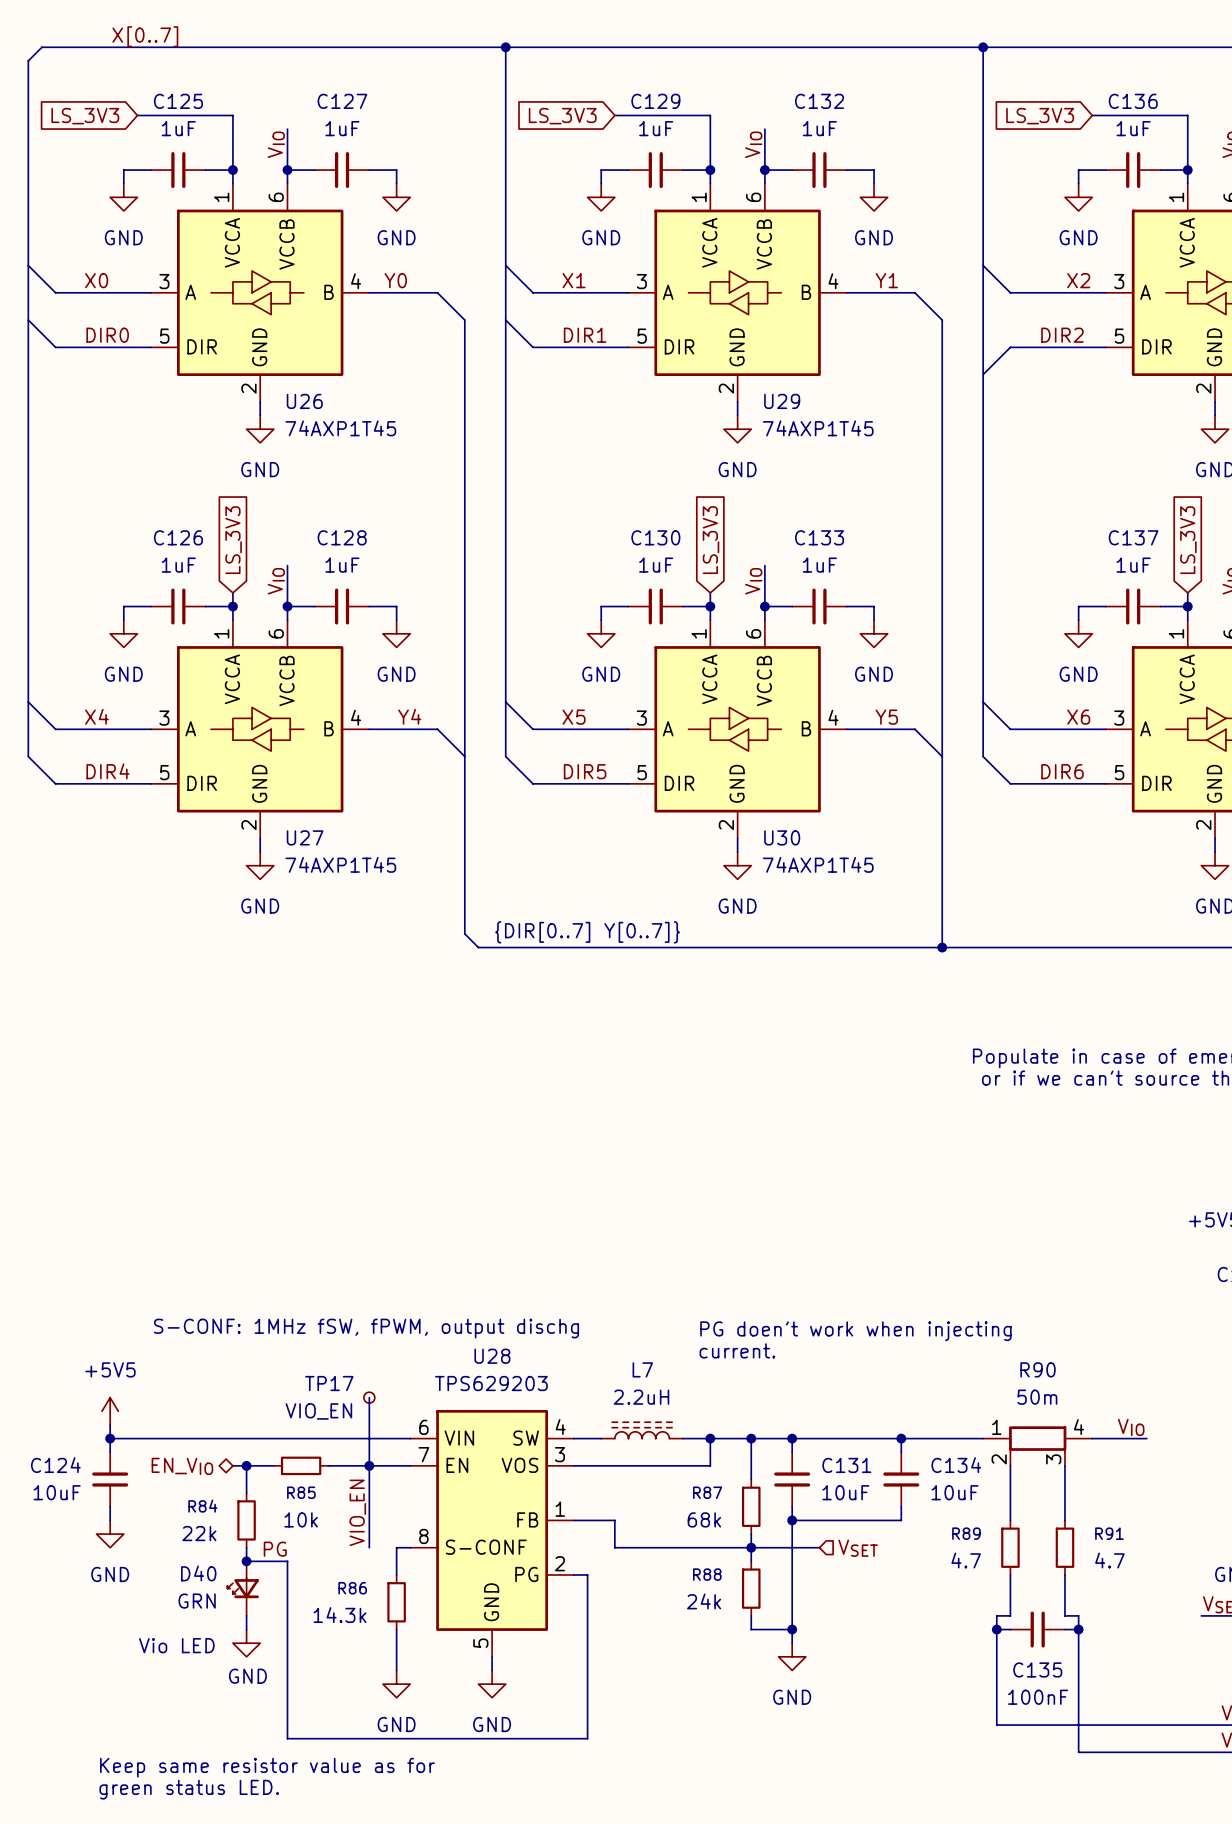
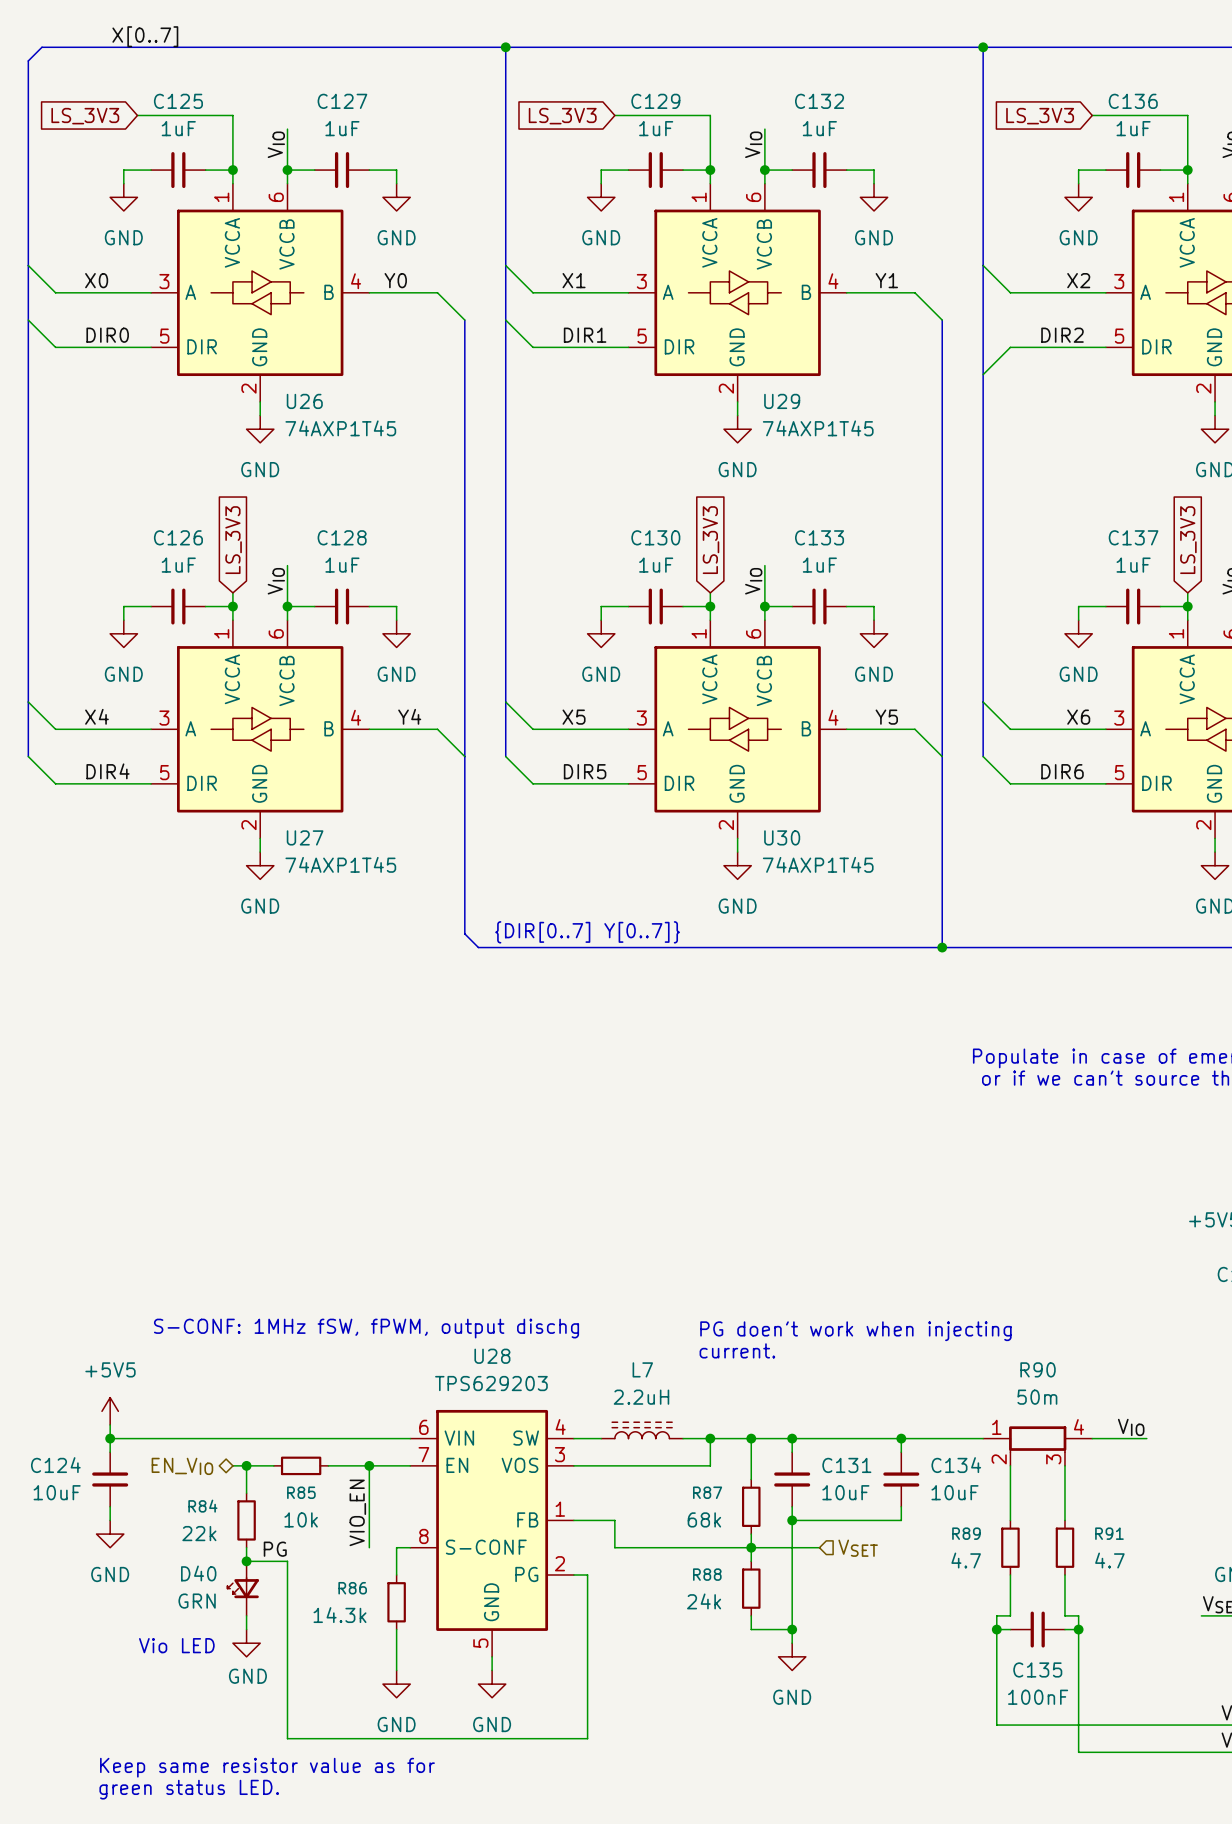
wire: (369, 1397) (369, 1465) -> none
TP17: VIO_EN (369, 1397) -> none

